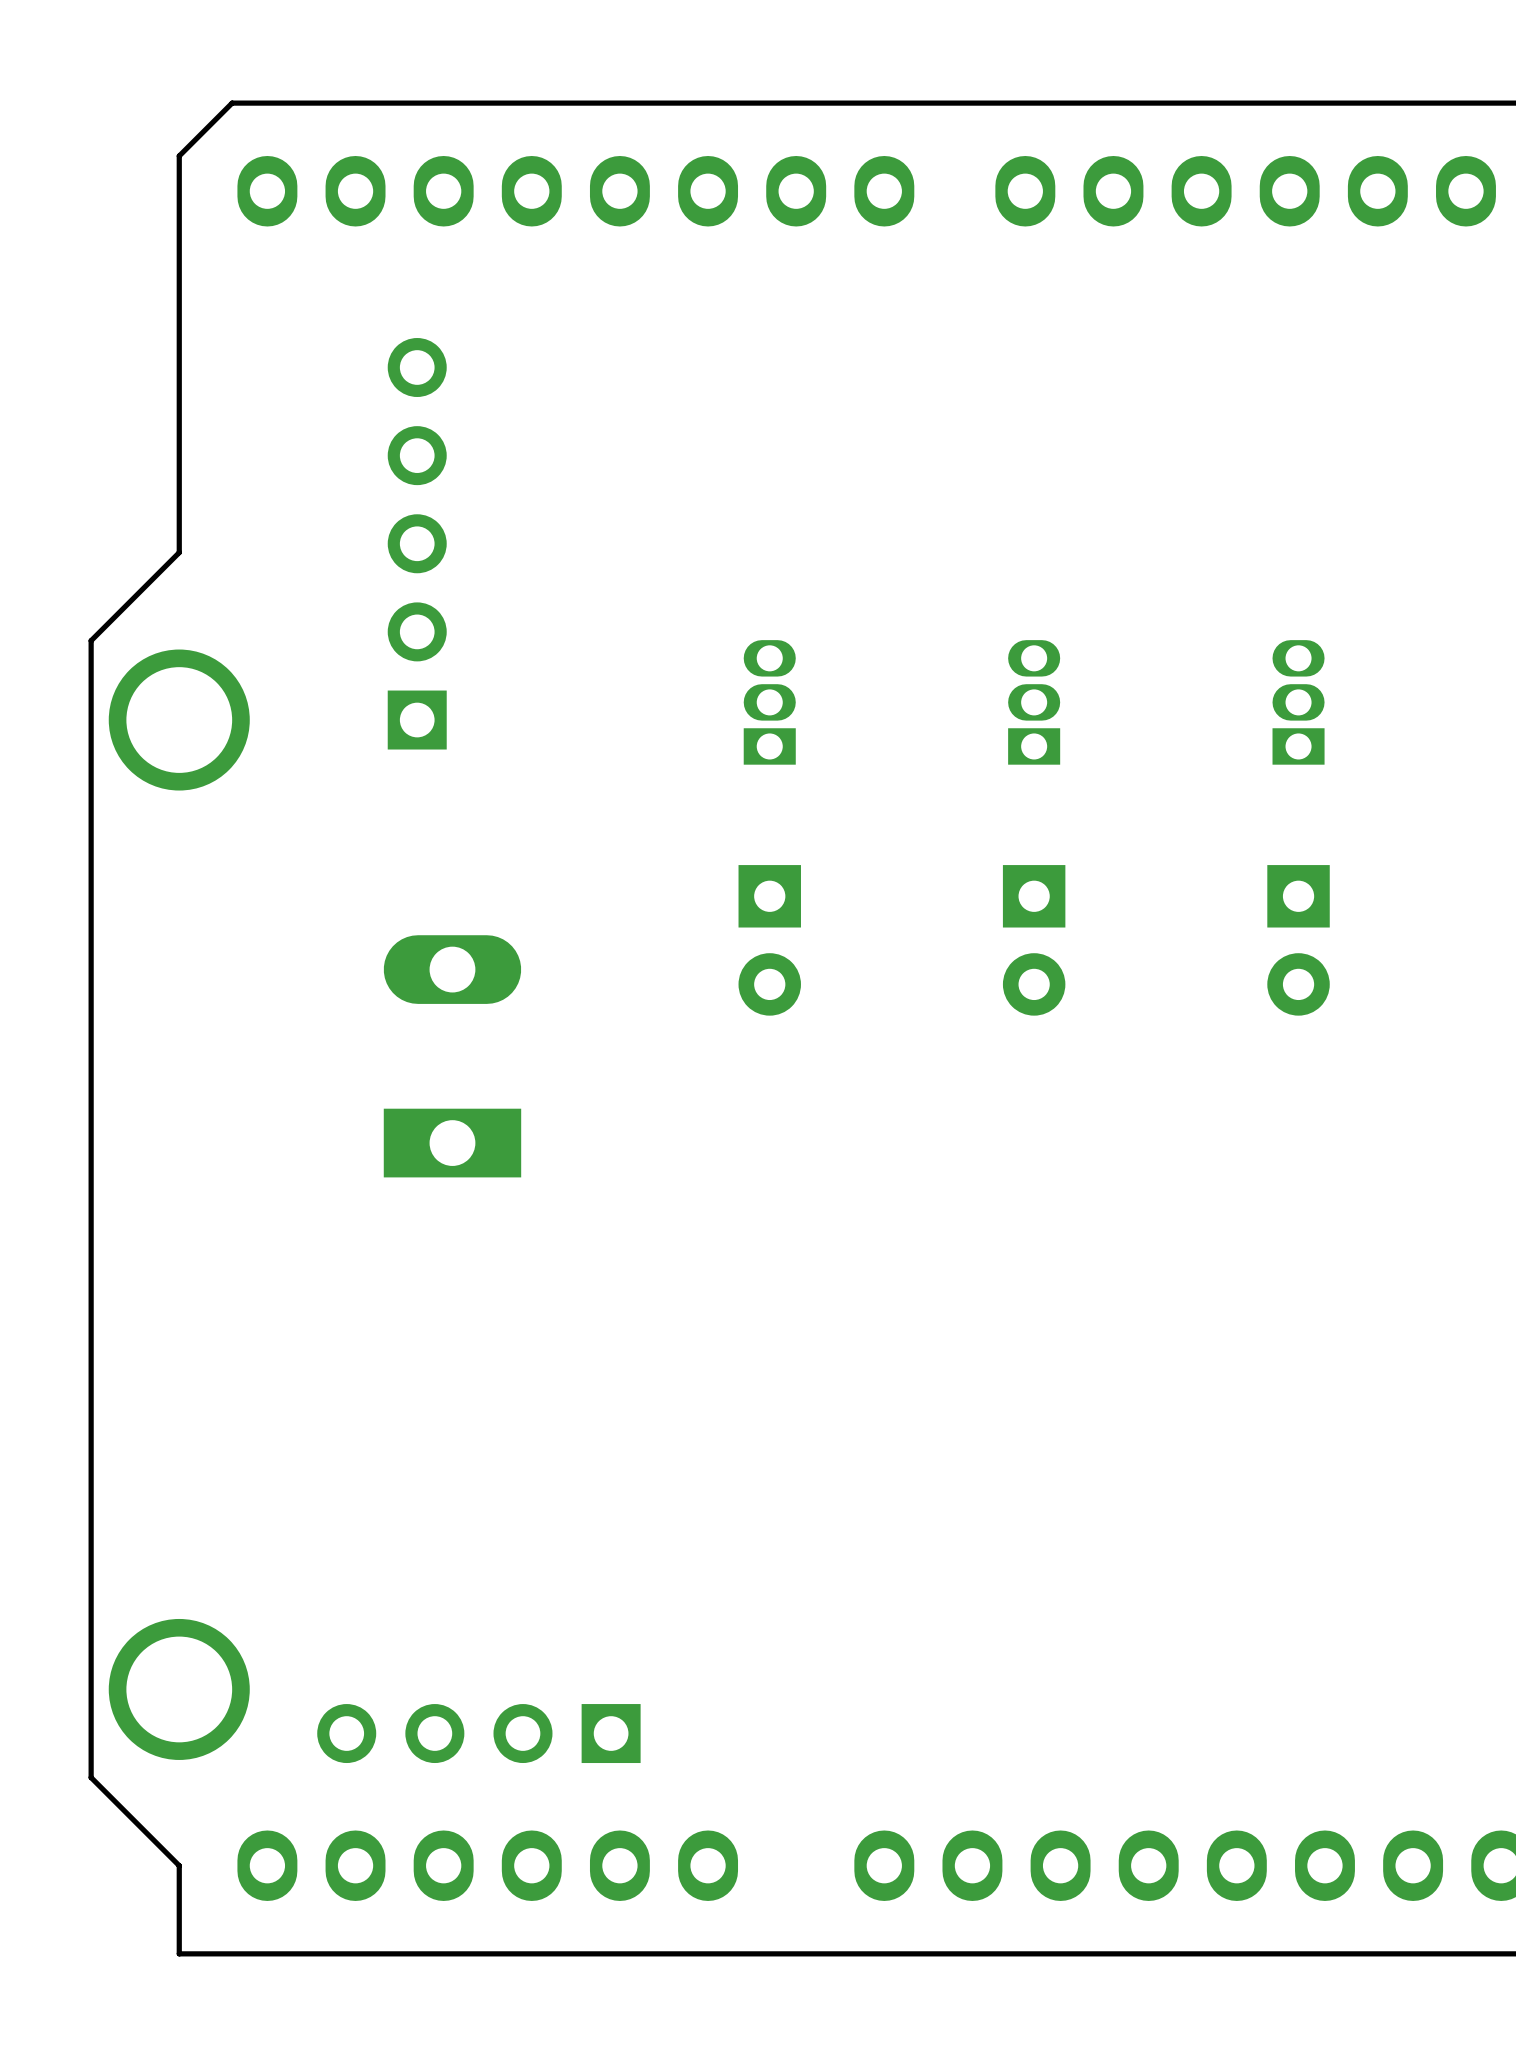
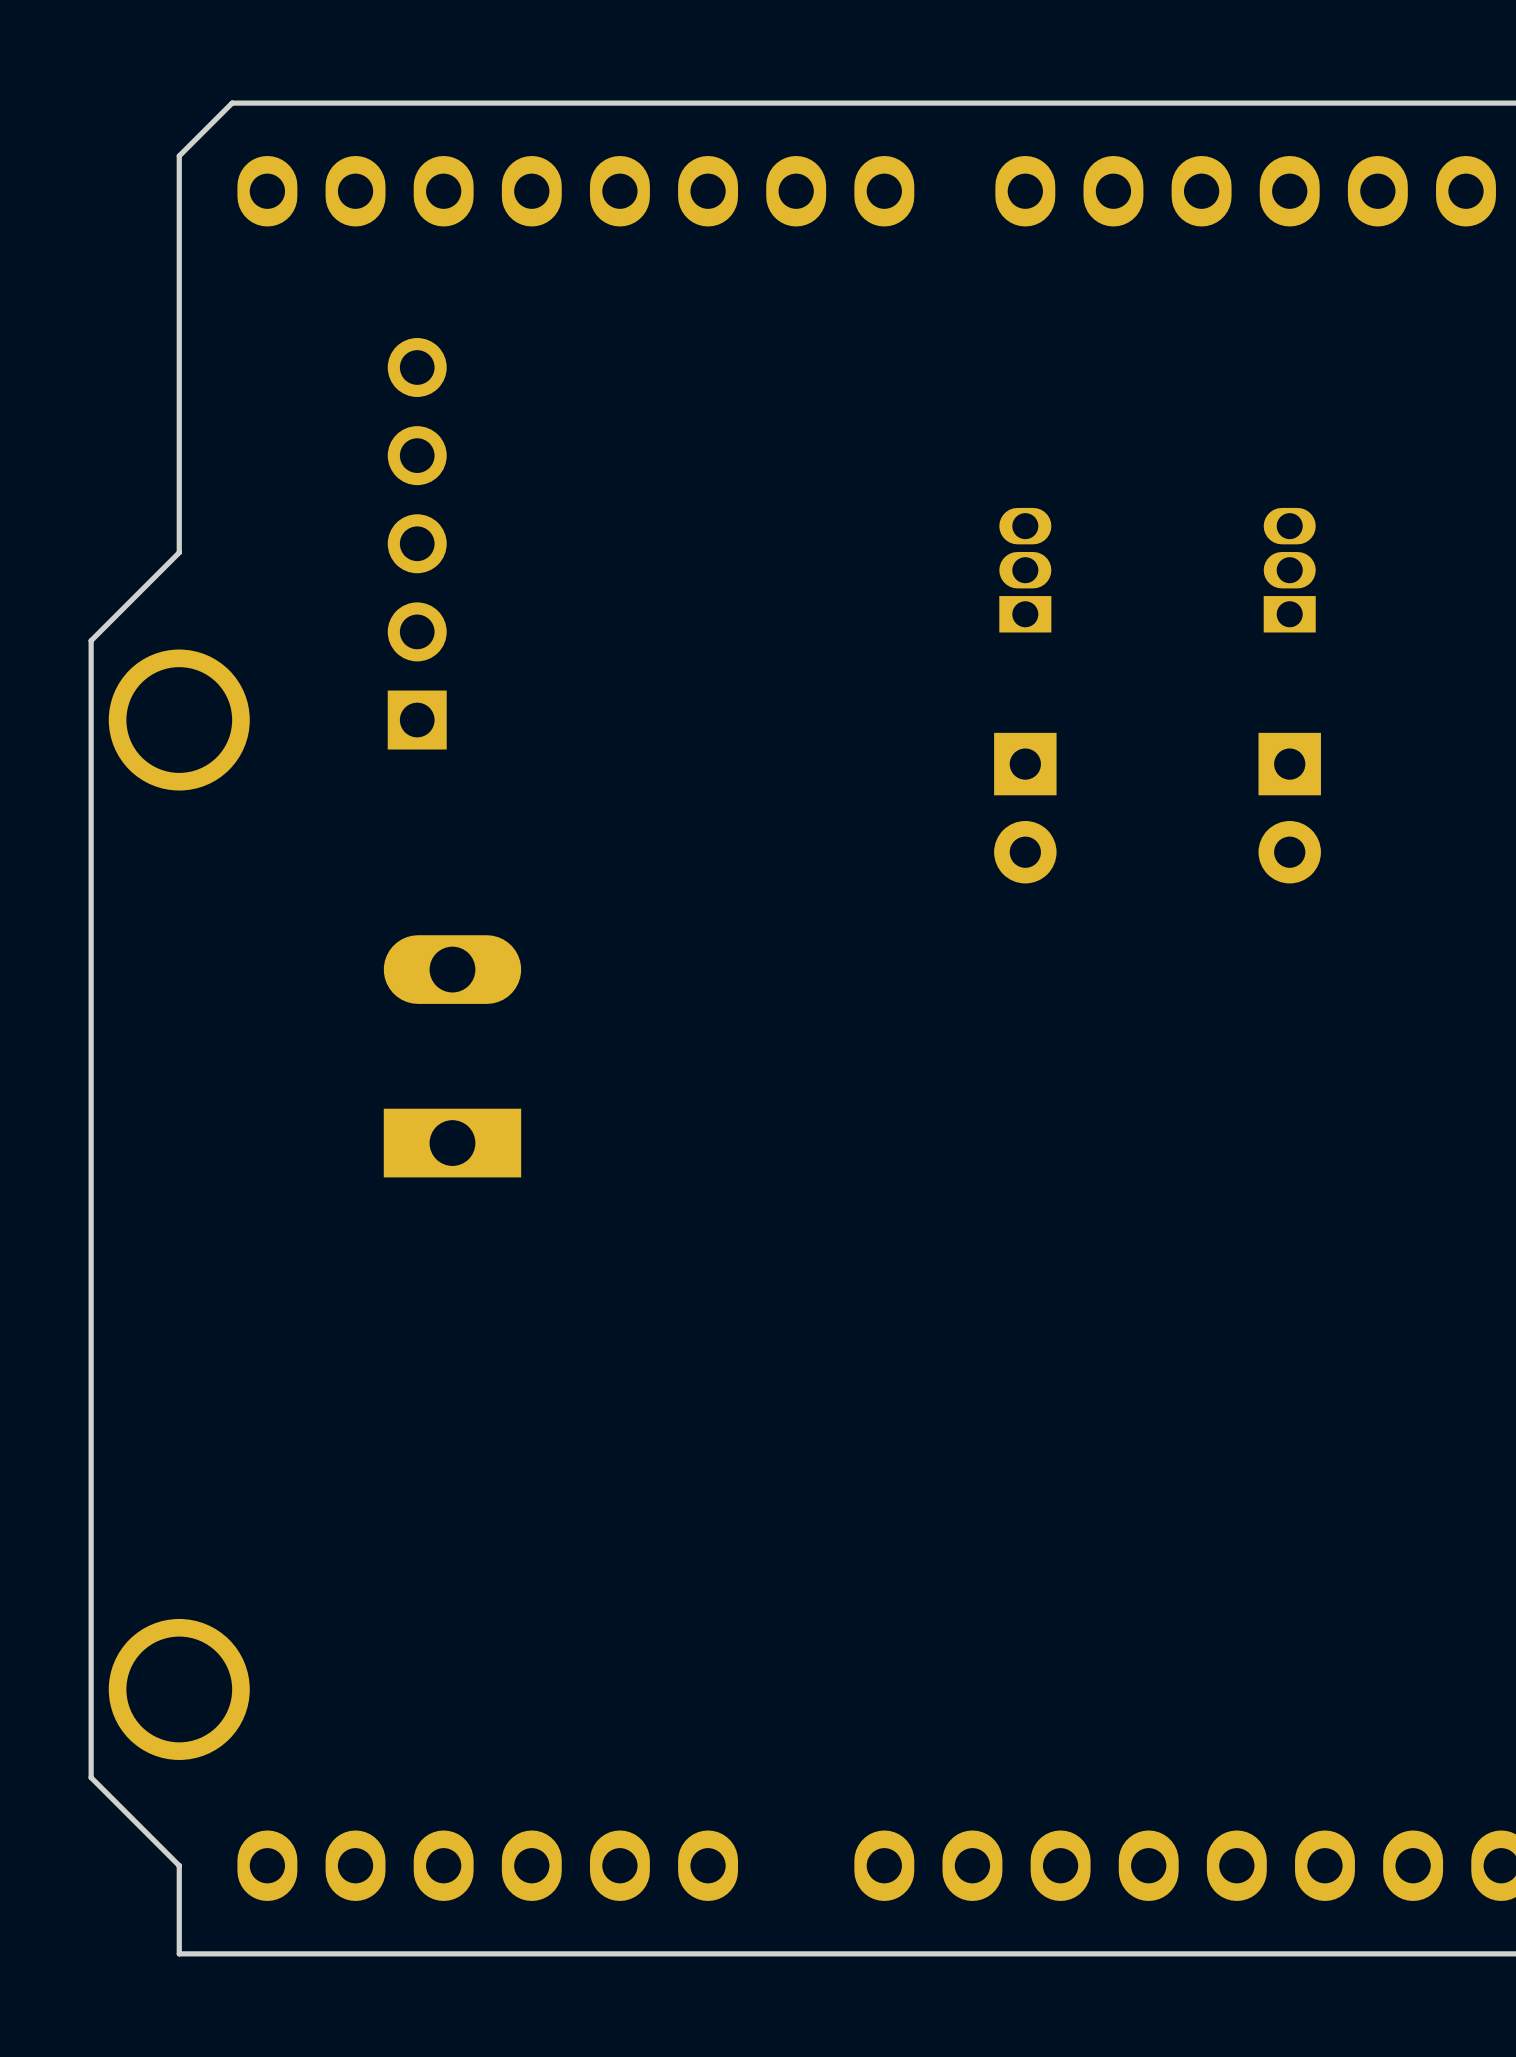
part: (769, 702) -> none
part position: (1034, 702) -> (1025, 570)
part position: (1298, 702) -> (1289, 570)
part: (769, 940) -> none
part position: (1034, 940) -> (1025, 808)
part position: (1298, 940) -> (1289, 808)
part: (478, 1733) -> none

